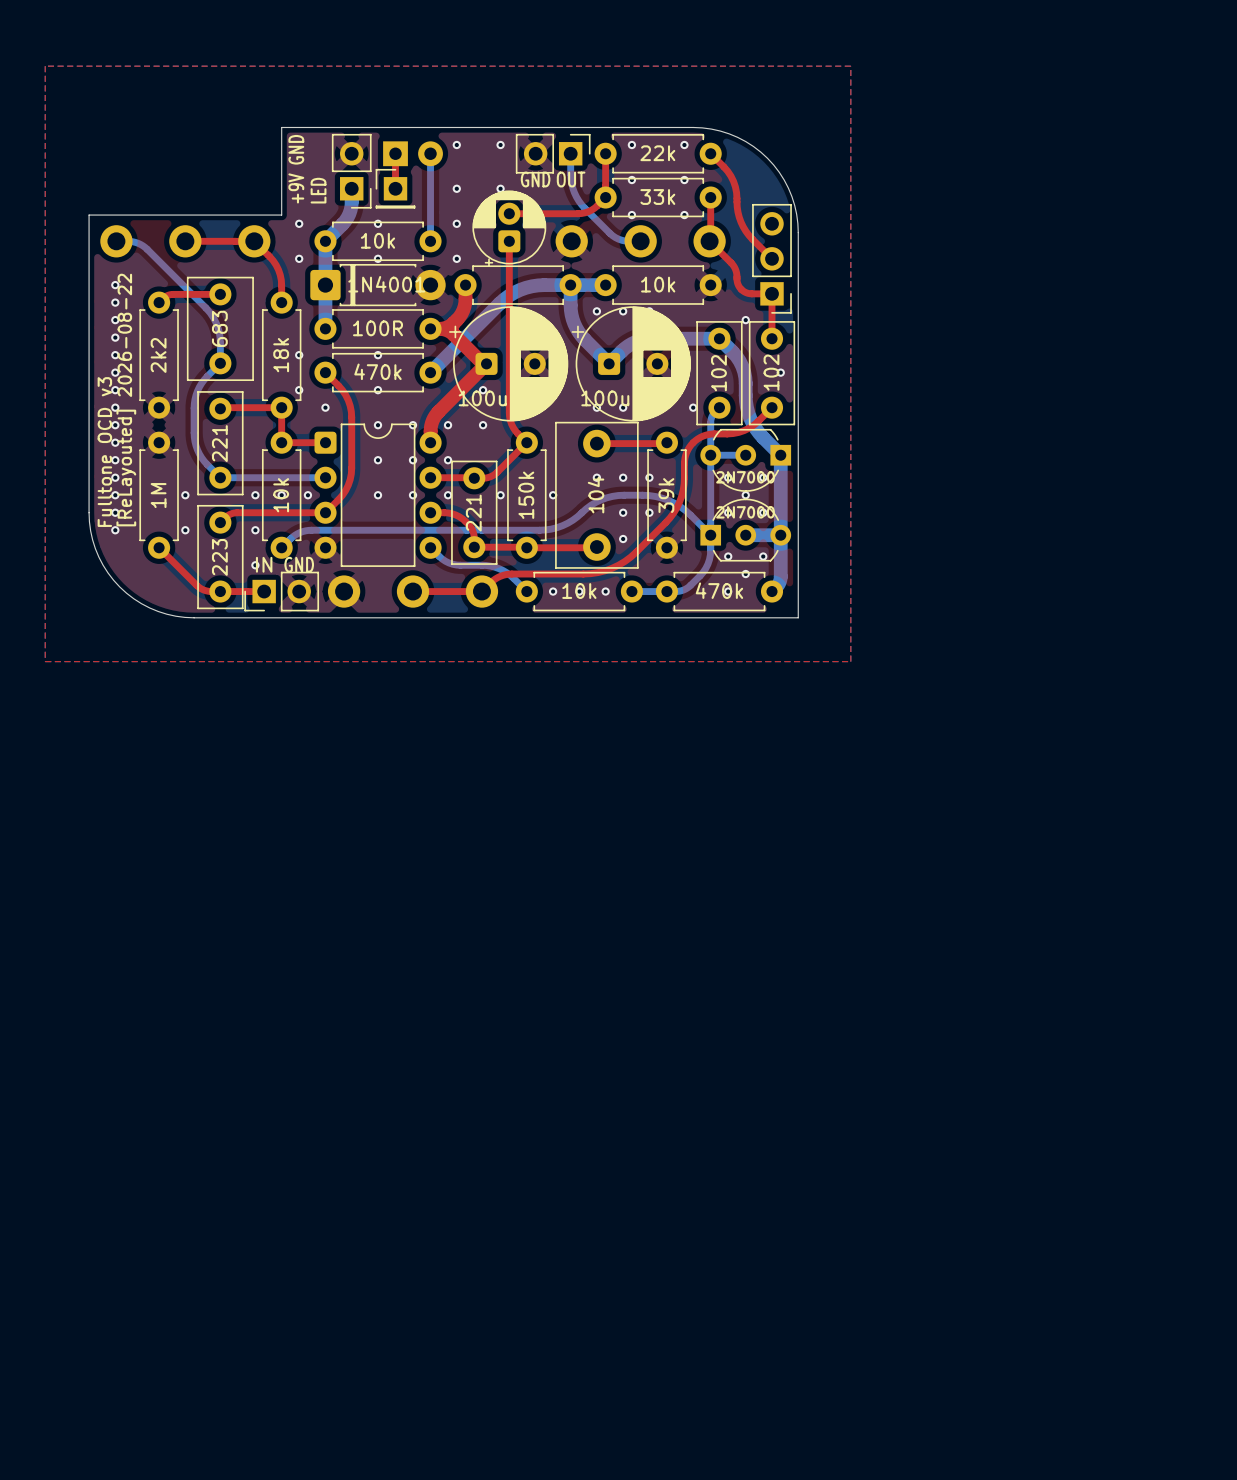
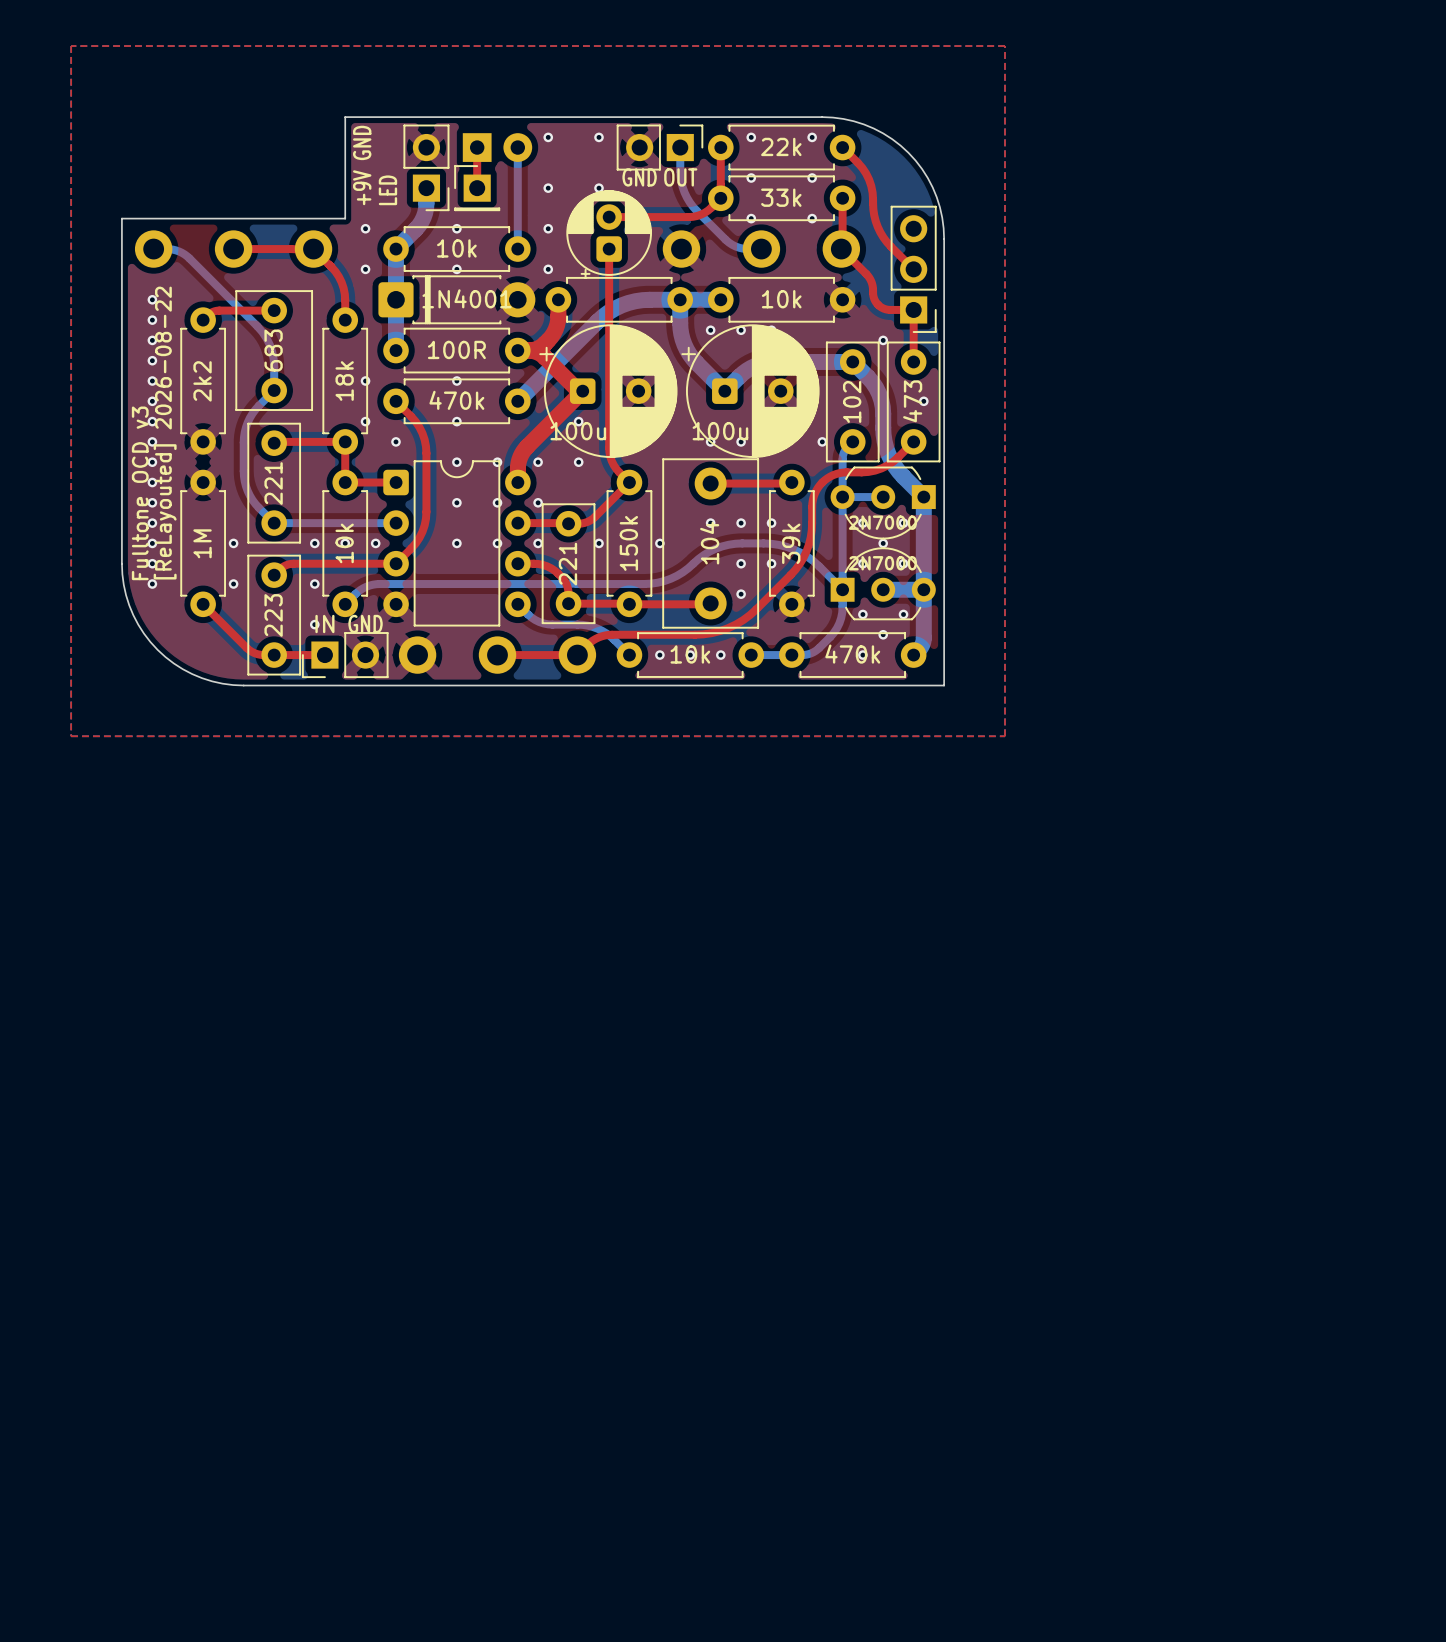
part value: 102 (771, 372) -> 473 (912, 401)

